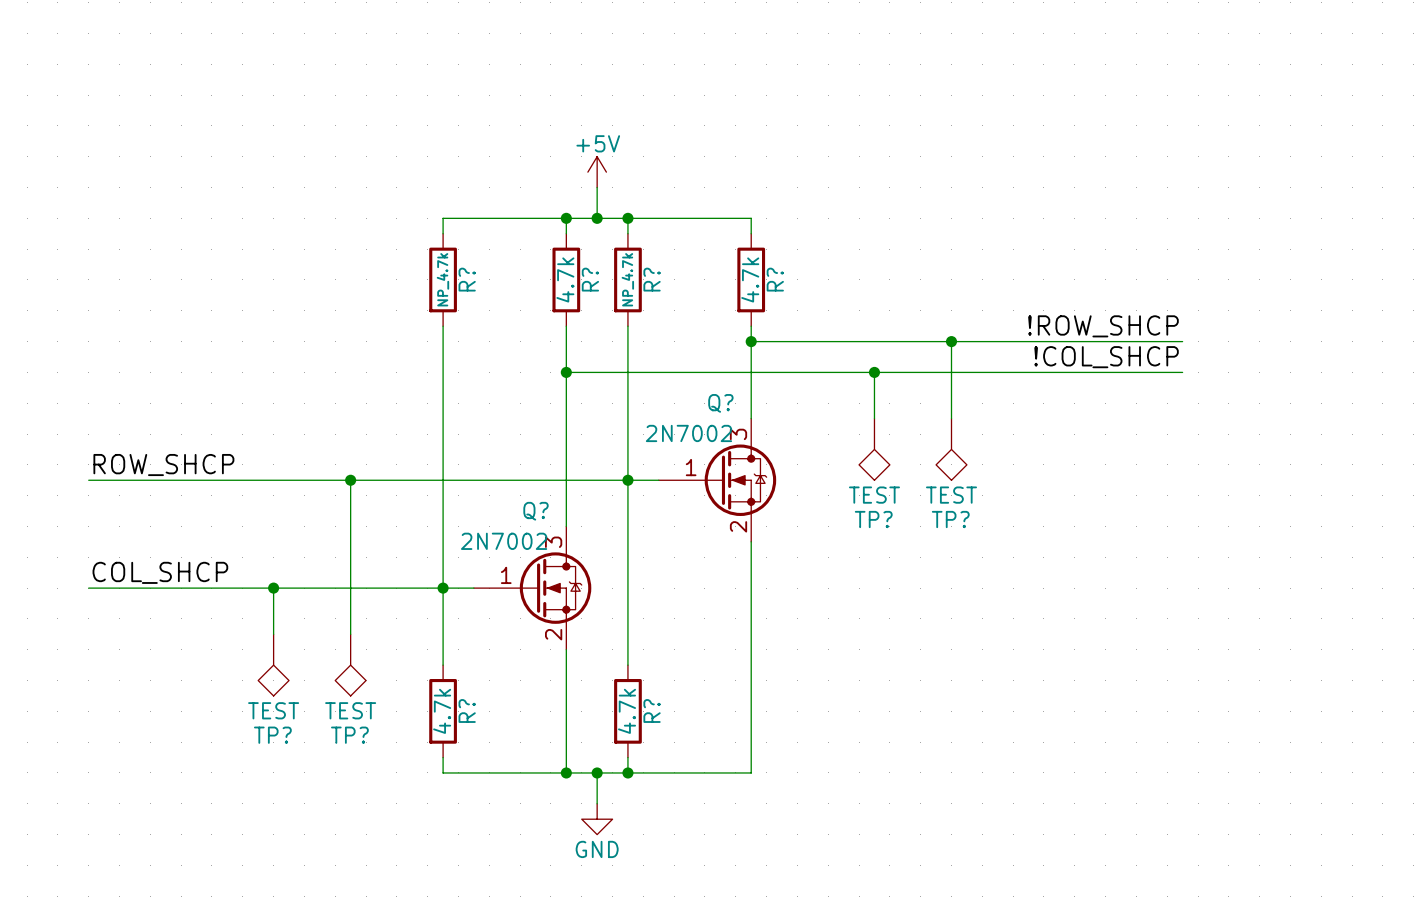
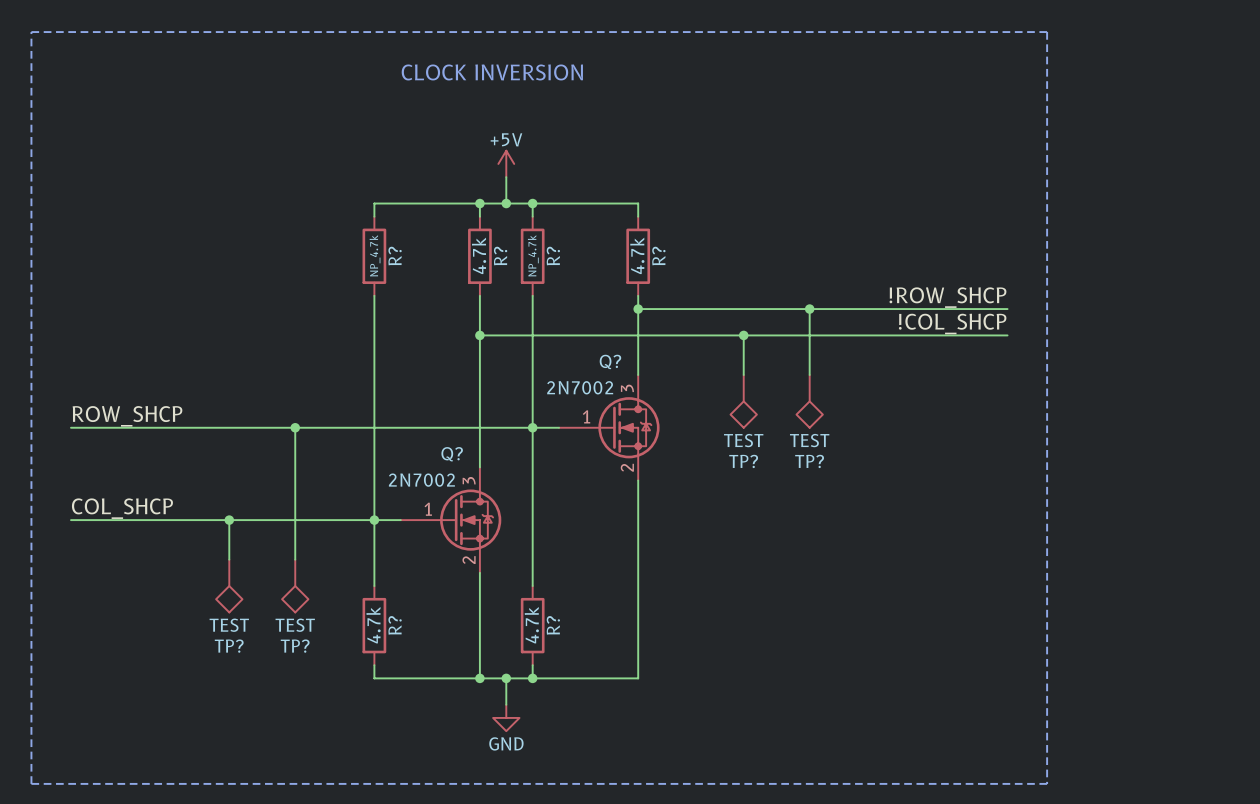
line: none -> (31, 32) (31, 783) (1047, 783) (1047, 32) (31, 32)
text: none -> CLOCK INVERSION (492, 72)

